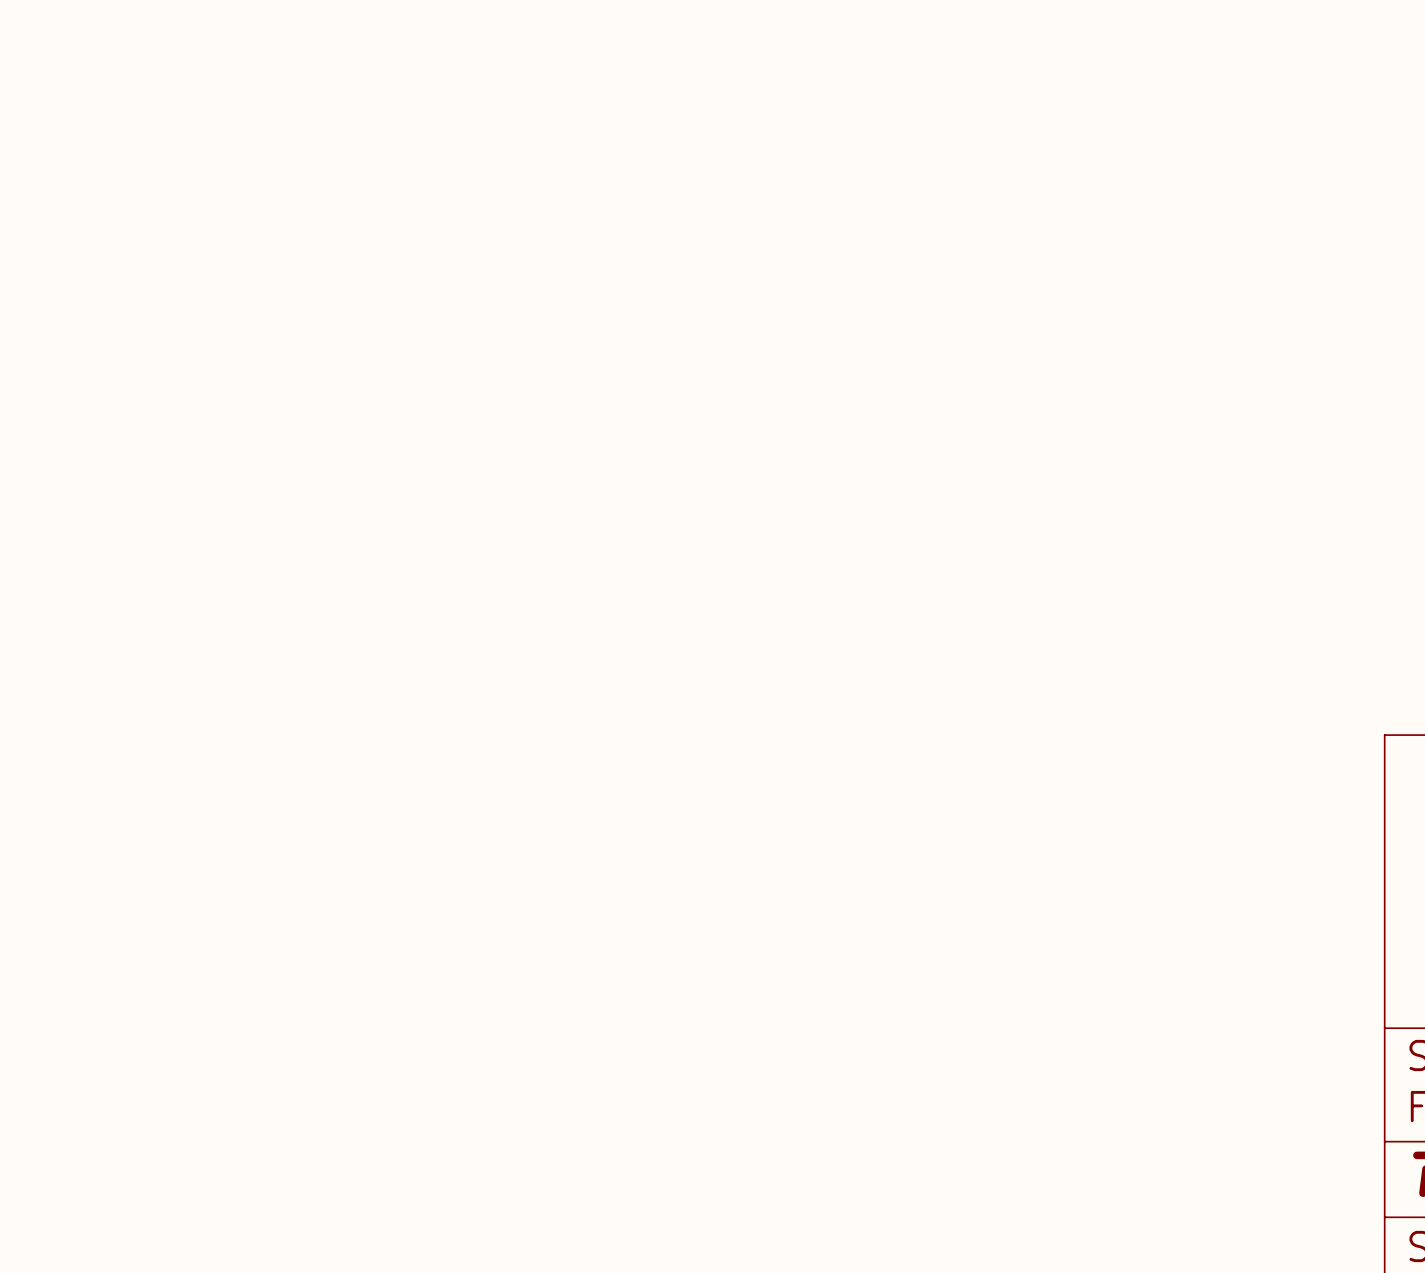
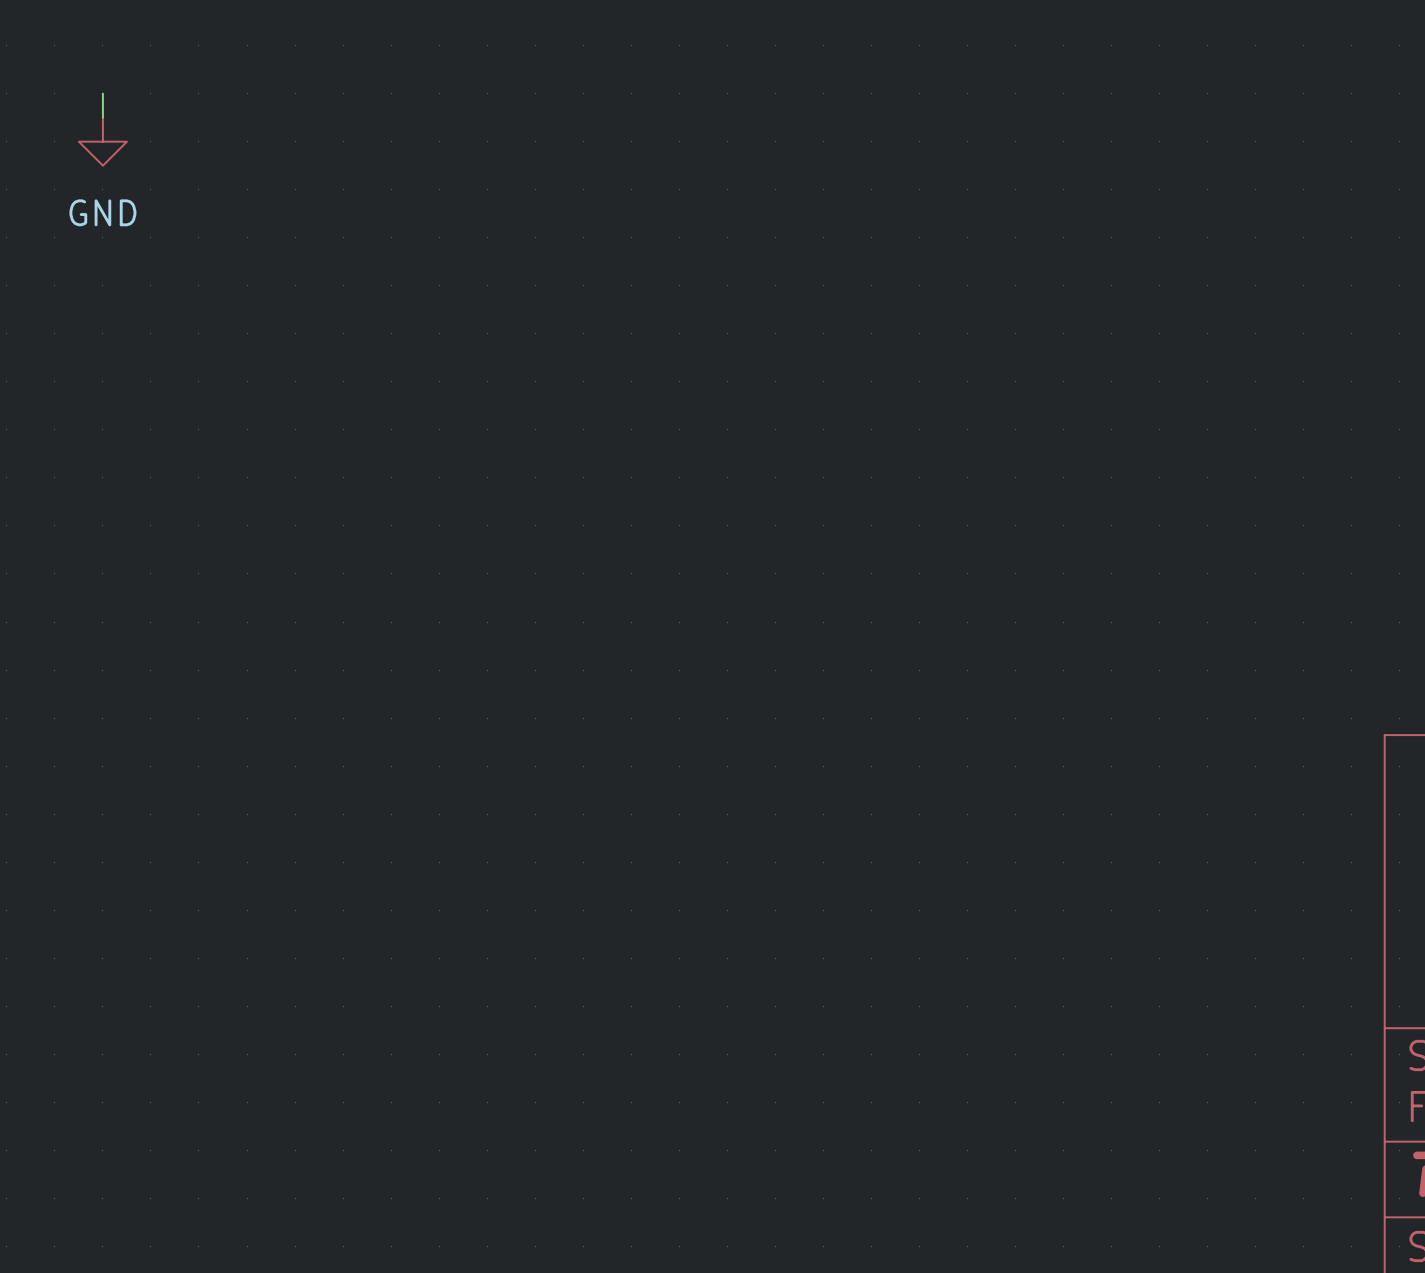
wire: none -> (102, 93) (102, 117)
power symbol: none -> GND (102, 141)

